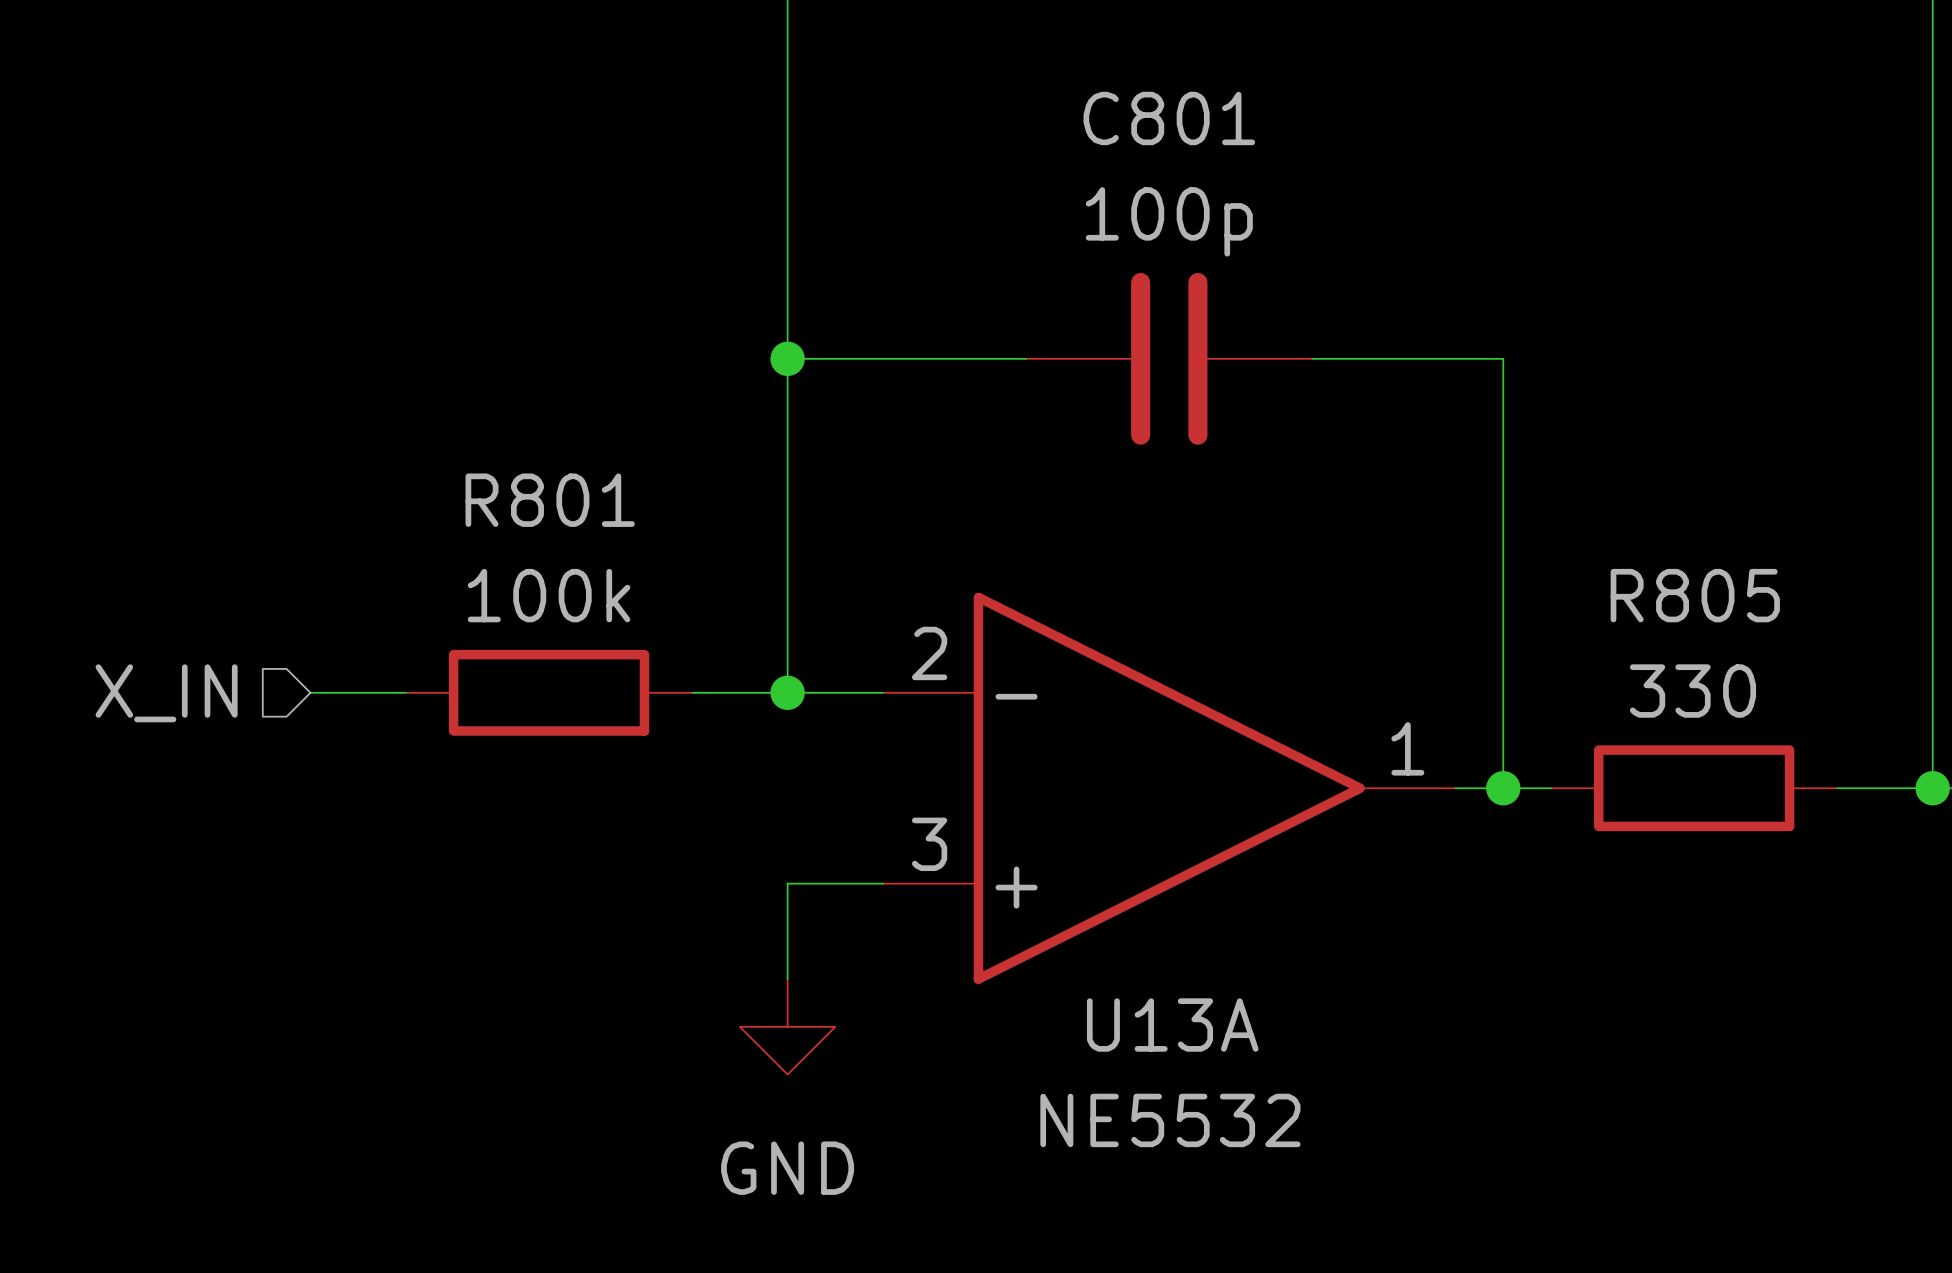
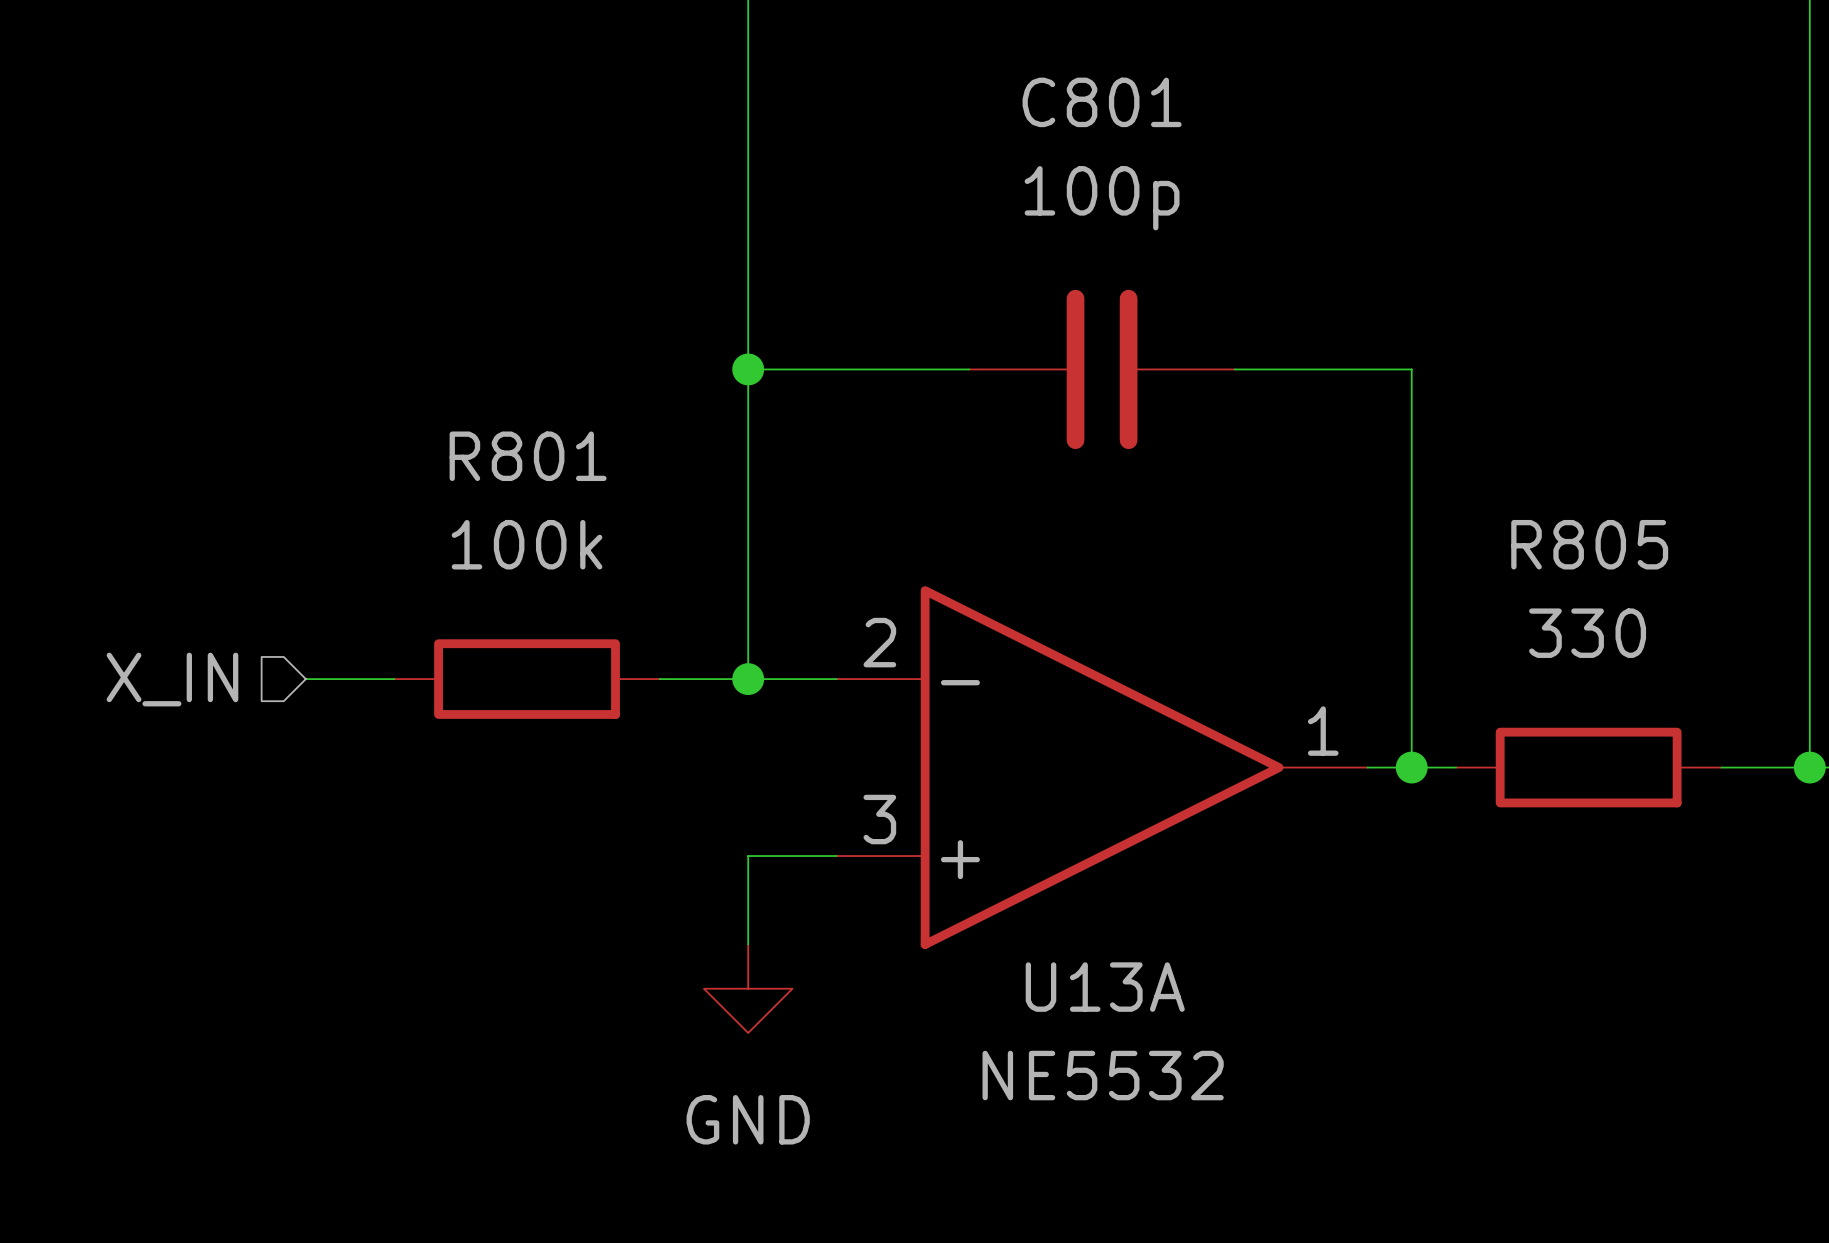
C801 name position: C801 (1169, 118) -> C801 (1102, 102)
C801 value position: 100p (1169, 221) -> 100p (1102, 198)
R801 name position: R801 (550, 500) -> R801 (528, 456)
R801 value position: 100k (549, 595) -> 100k (527, 544)
R805 name position: R805 (1695, 595) -> R805 (1589, 544)
R805 value position: 330 (1693, 691) -> 330 (1587, 633)

